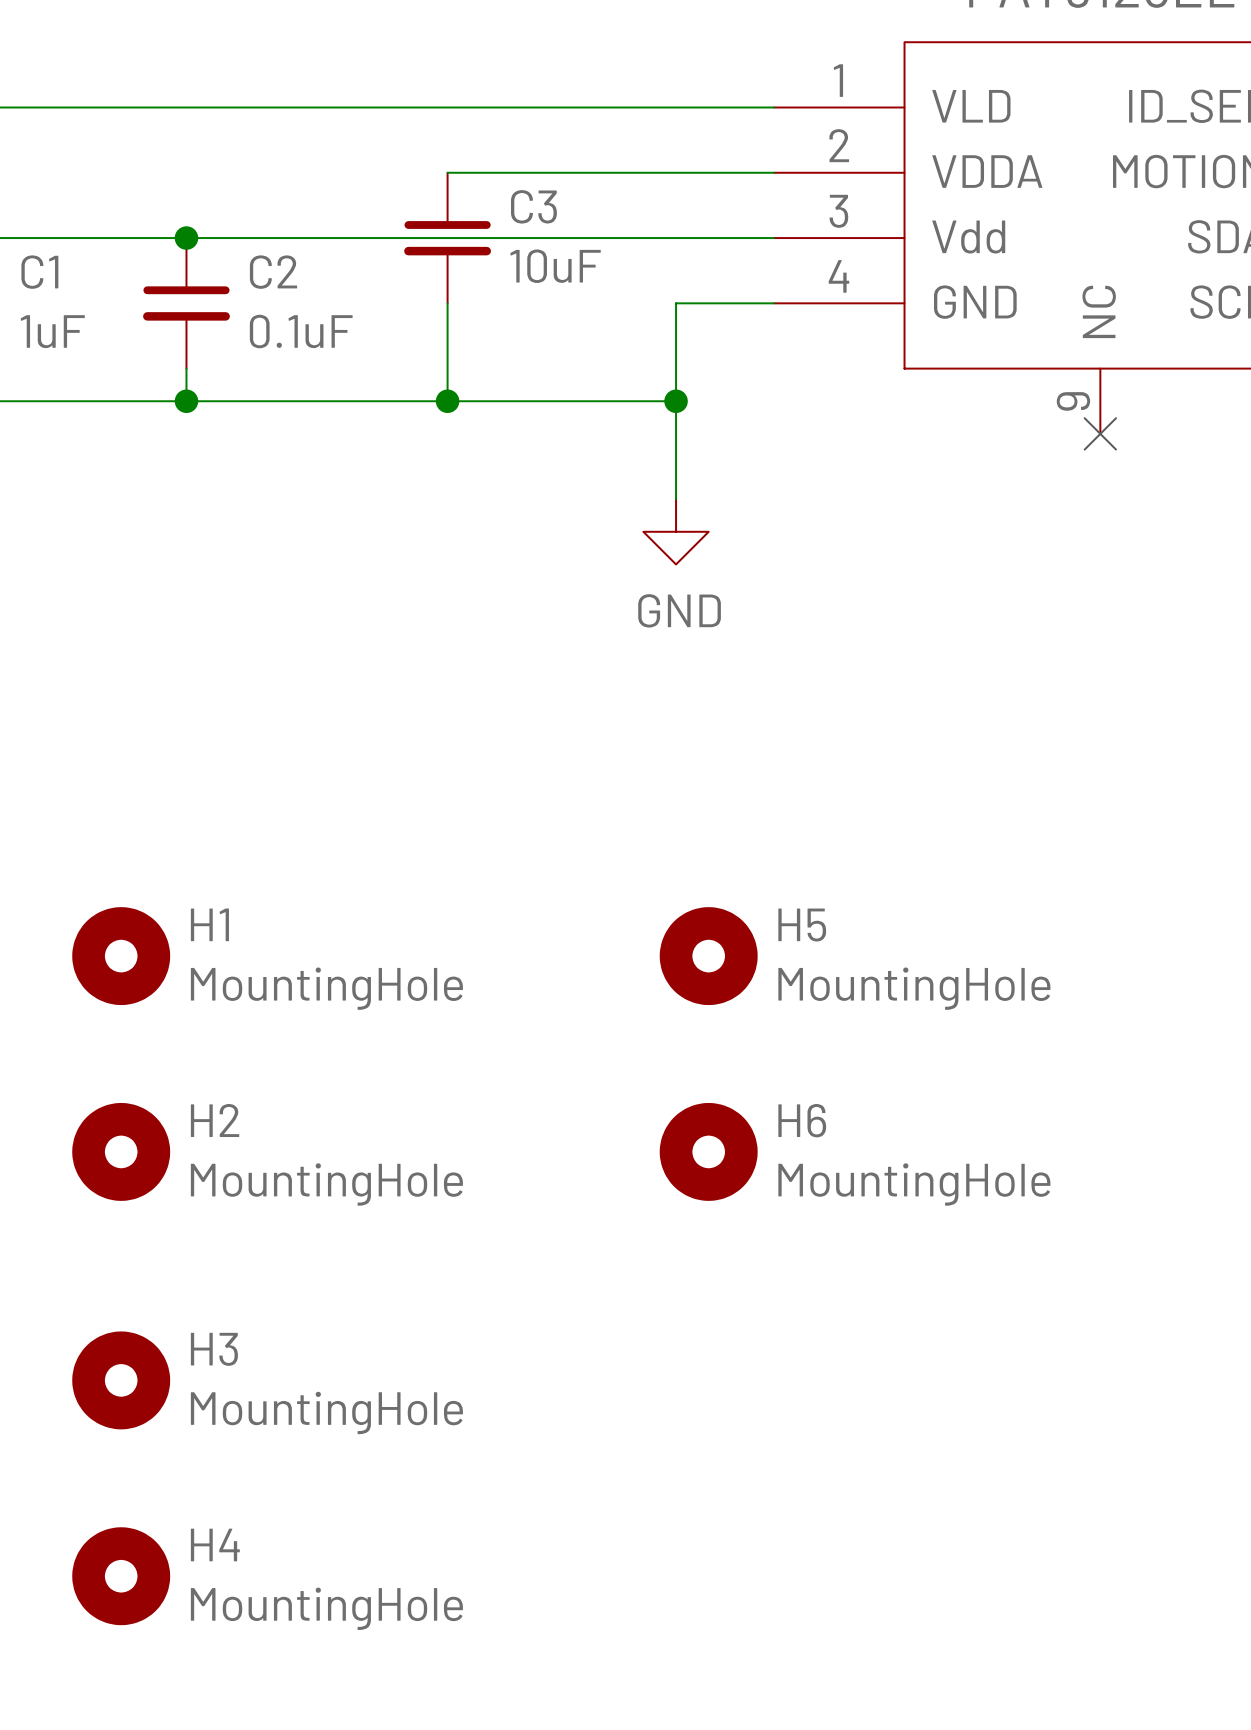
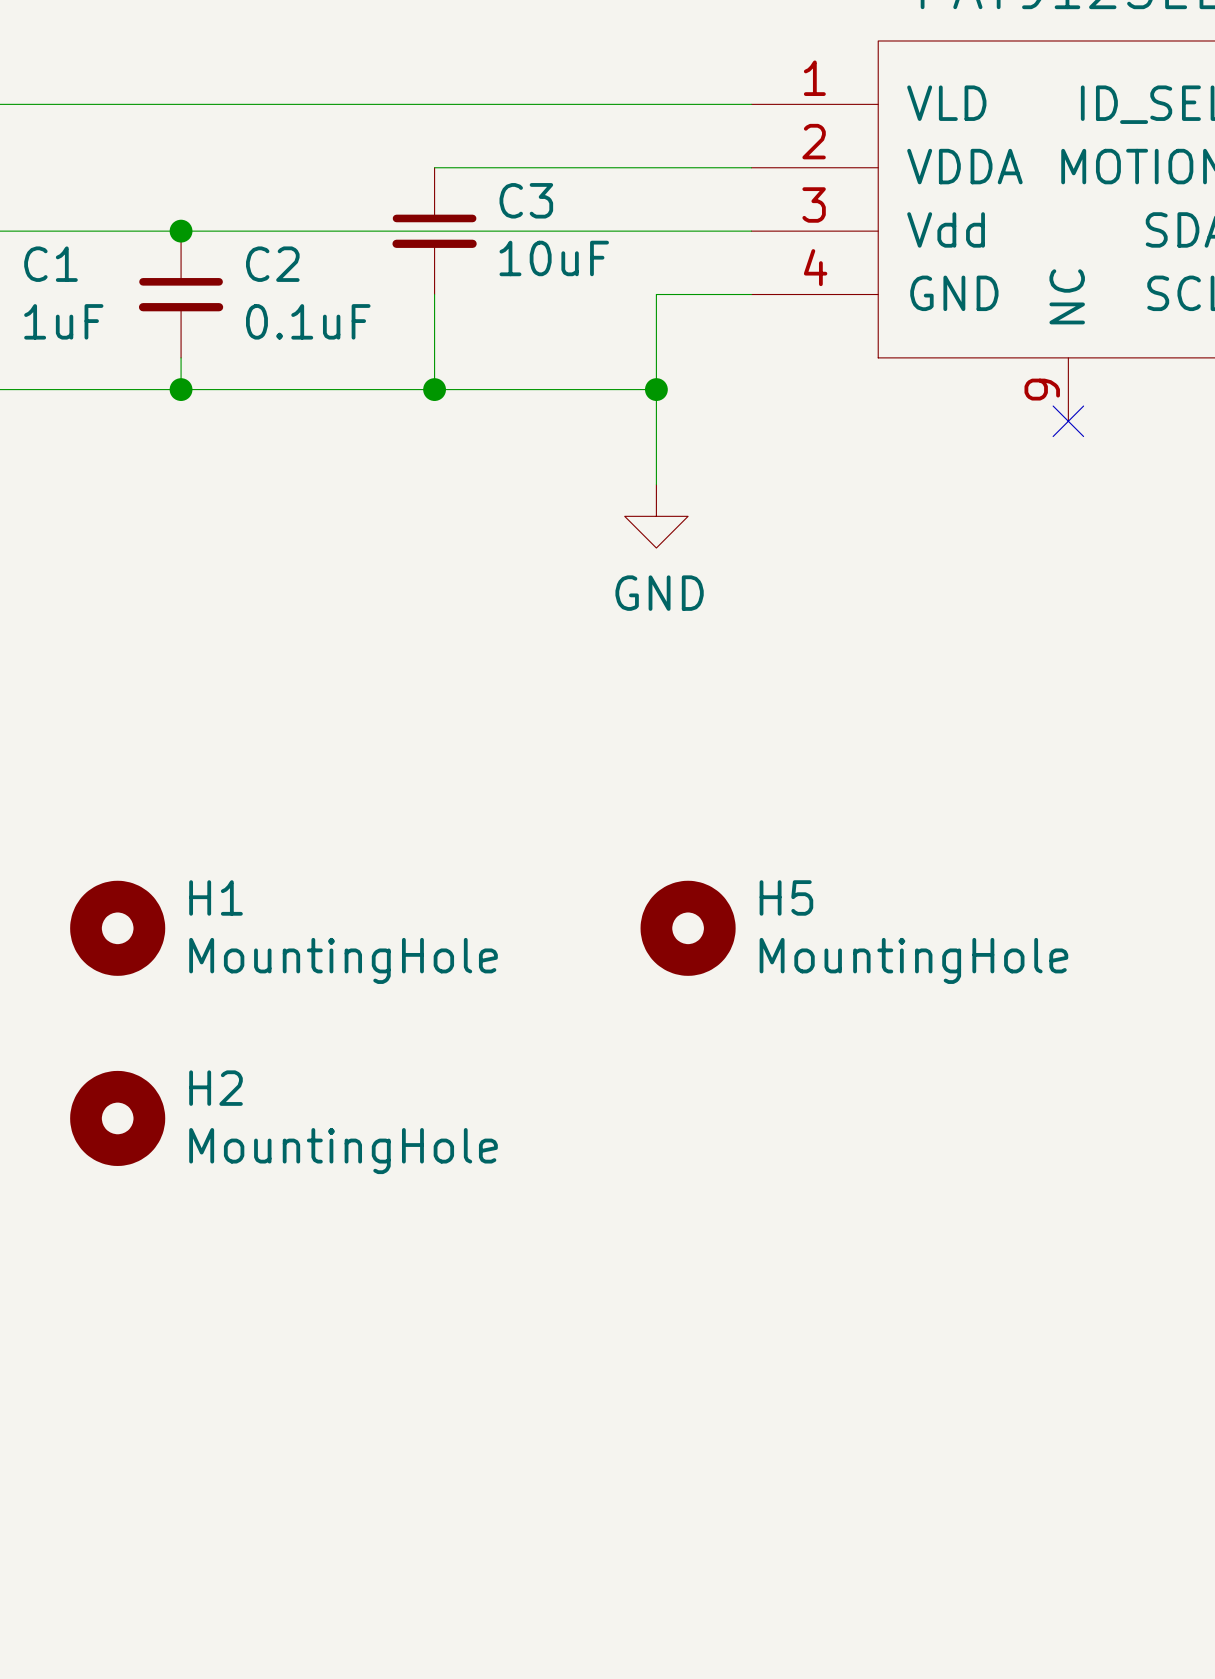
H6: MountingHole (708, 1151) -> none
H3: MountingHole (121, 1380) -> none
H4: MountingHole (121, 1576) -> none

